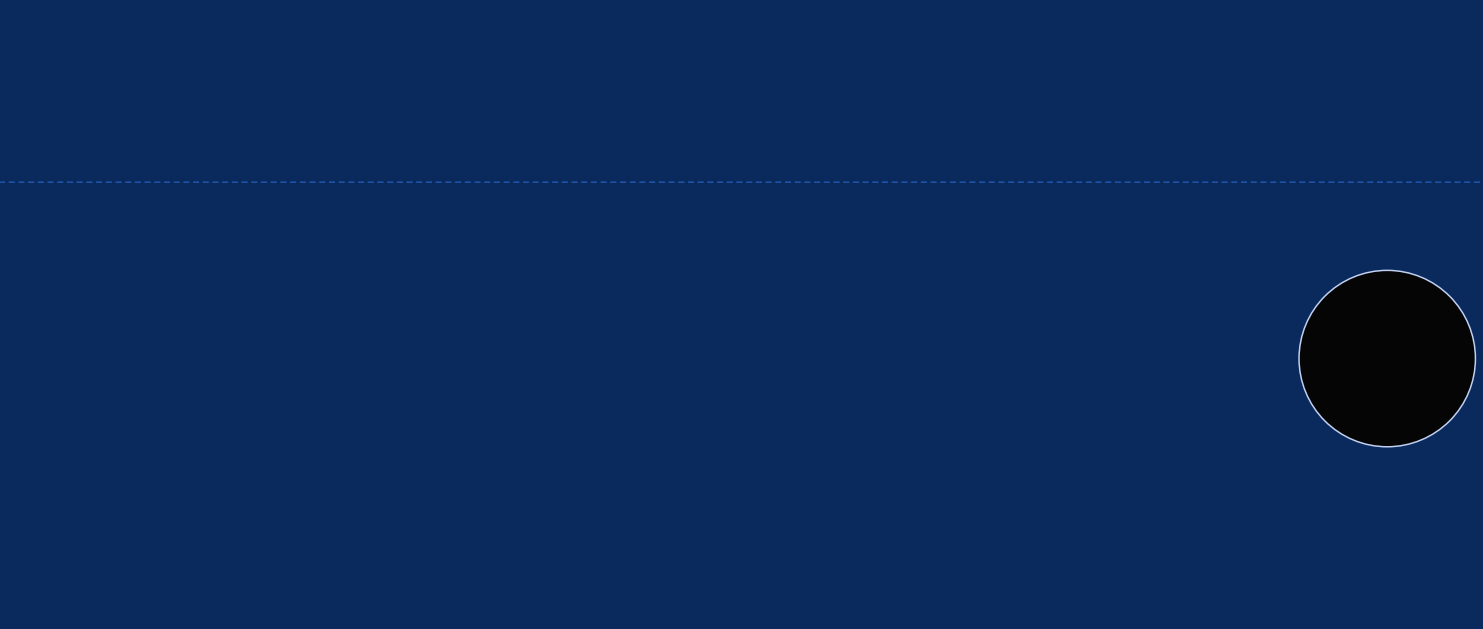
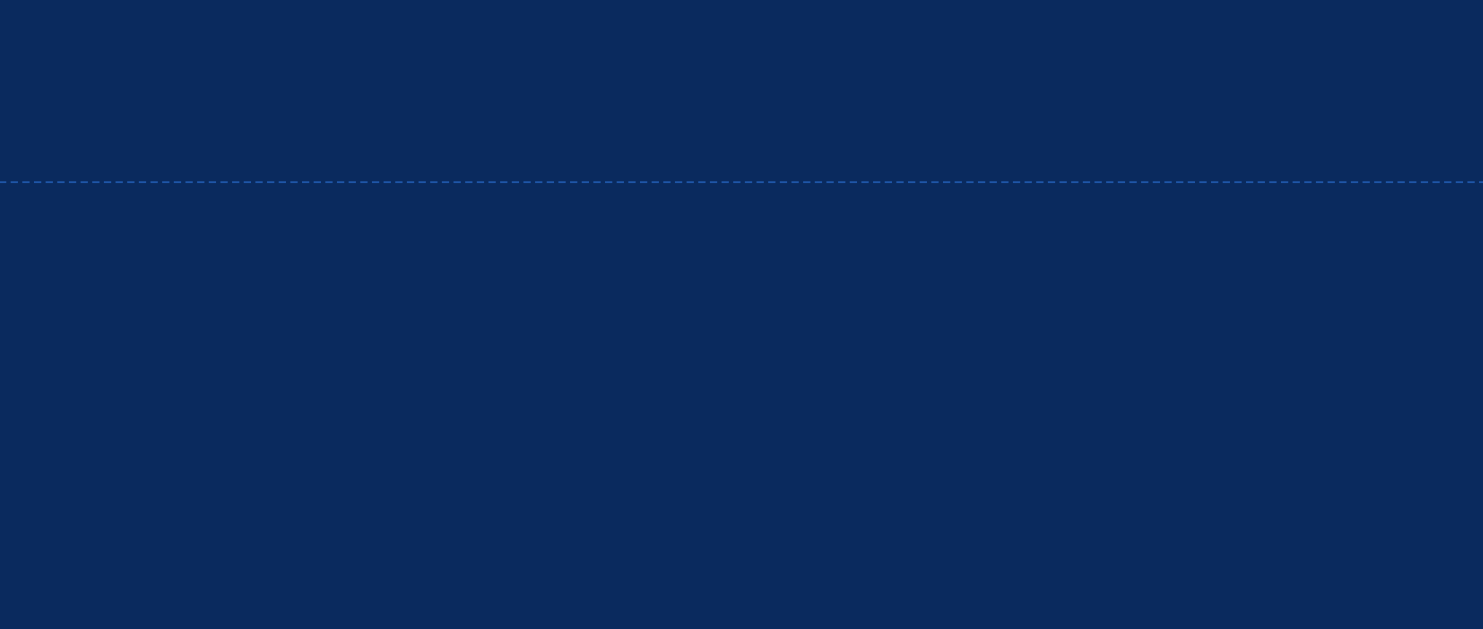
part: (1387, 358) -> none

